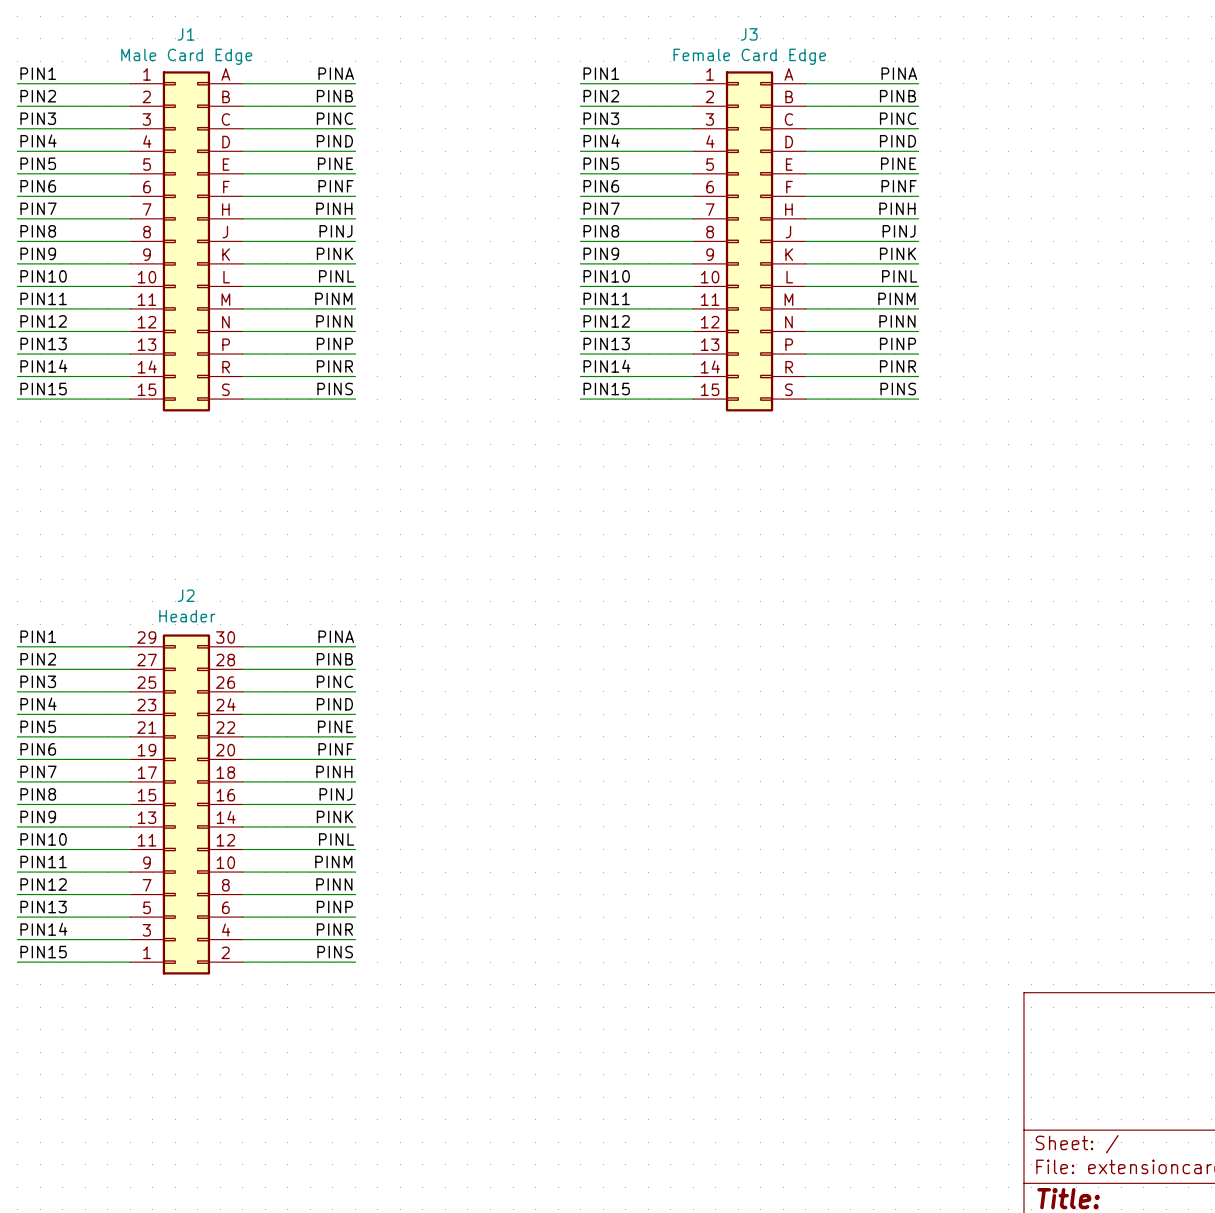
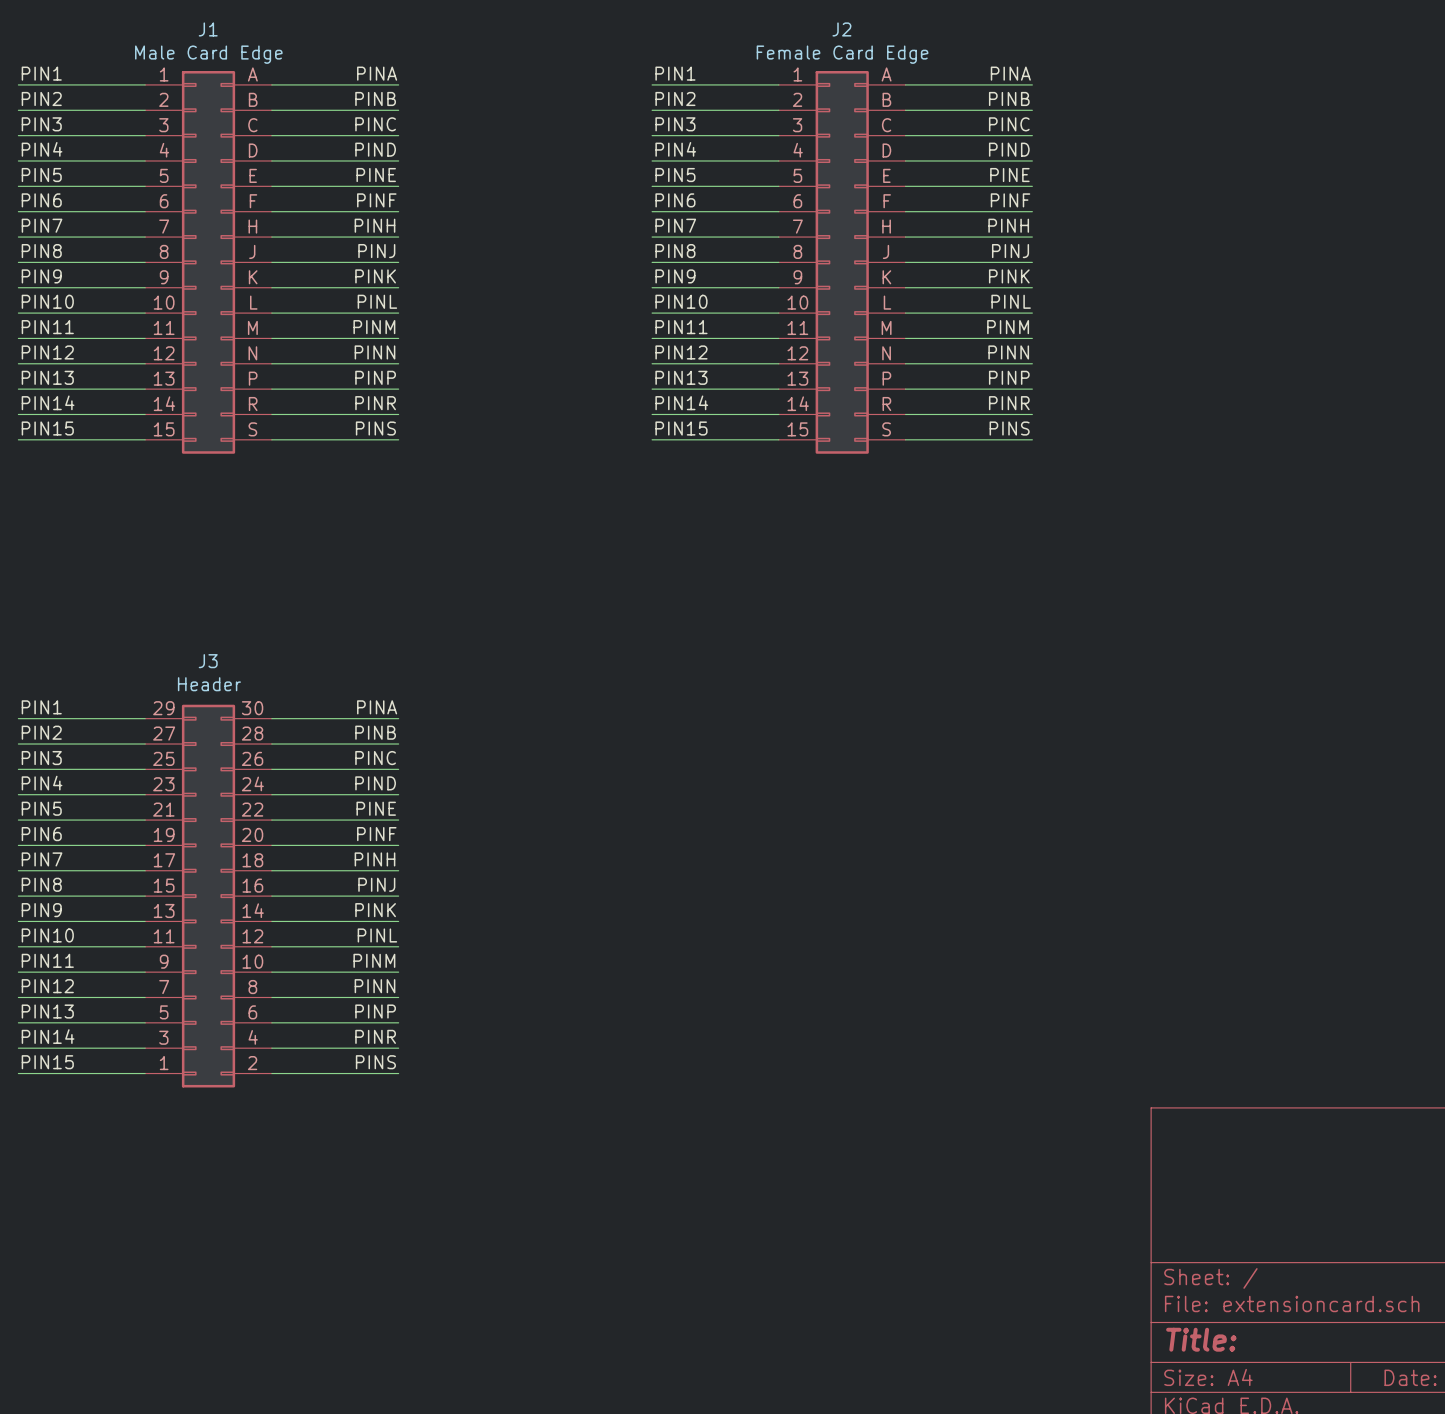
J3 name: J3 (749, 34) -> J2 (841, 29)
J2 name: J2 (186, 595) -> J3 (208, 661)

